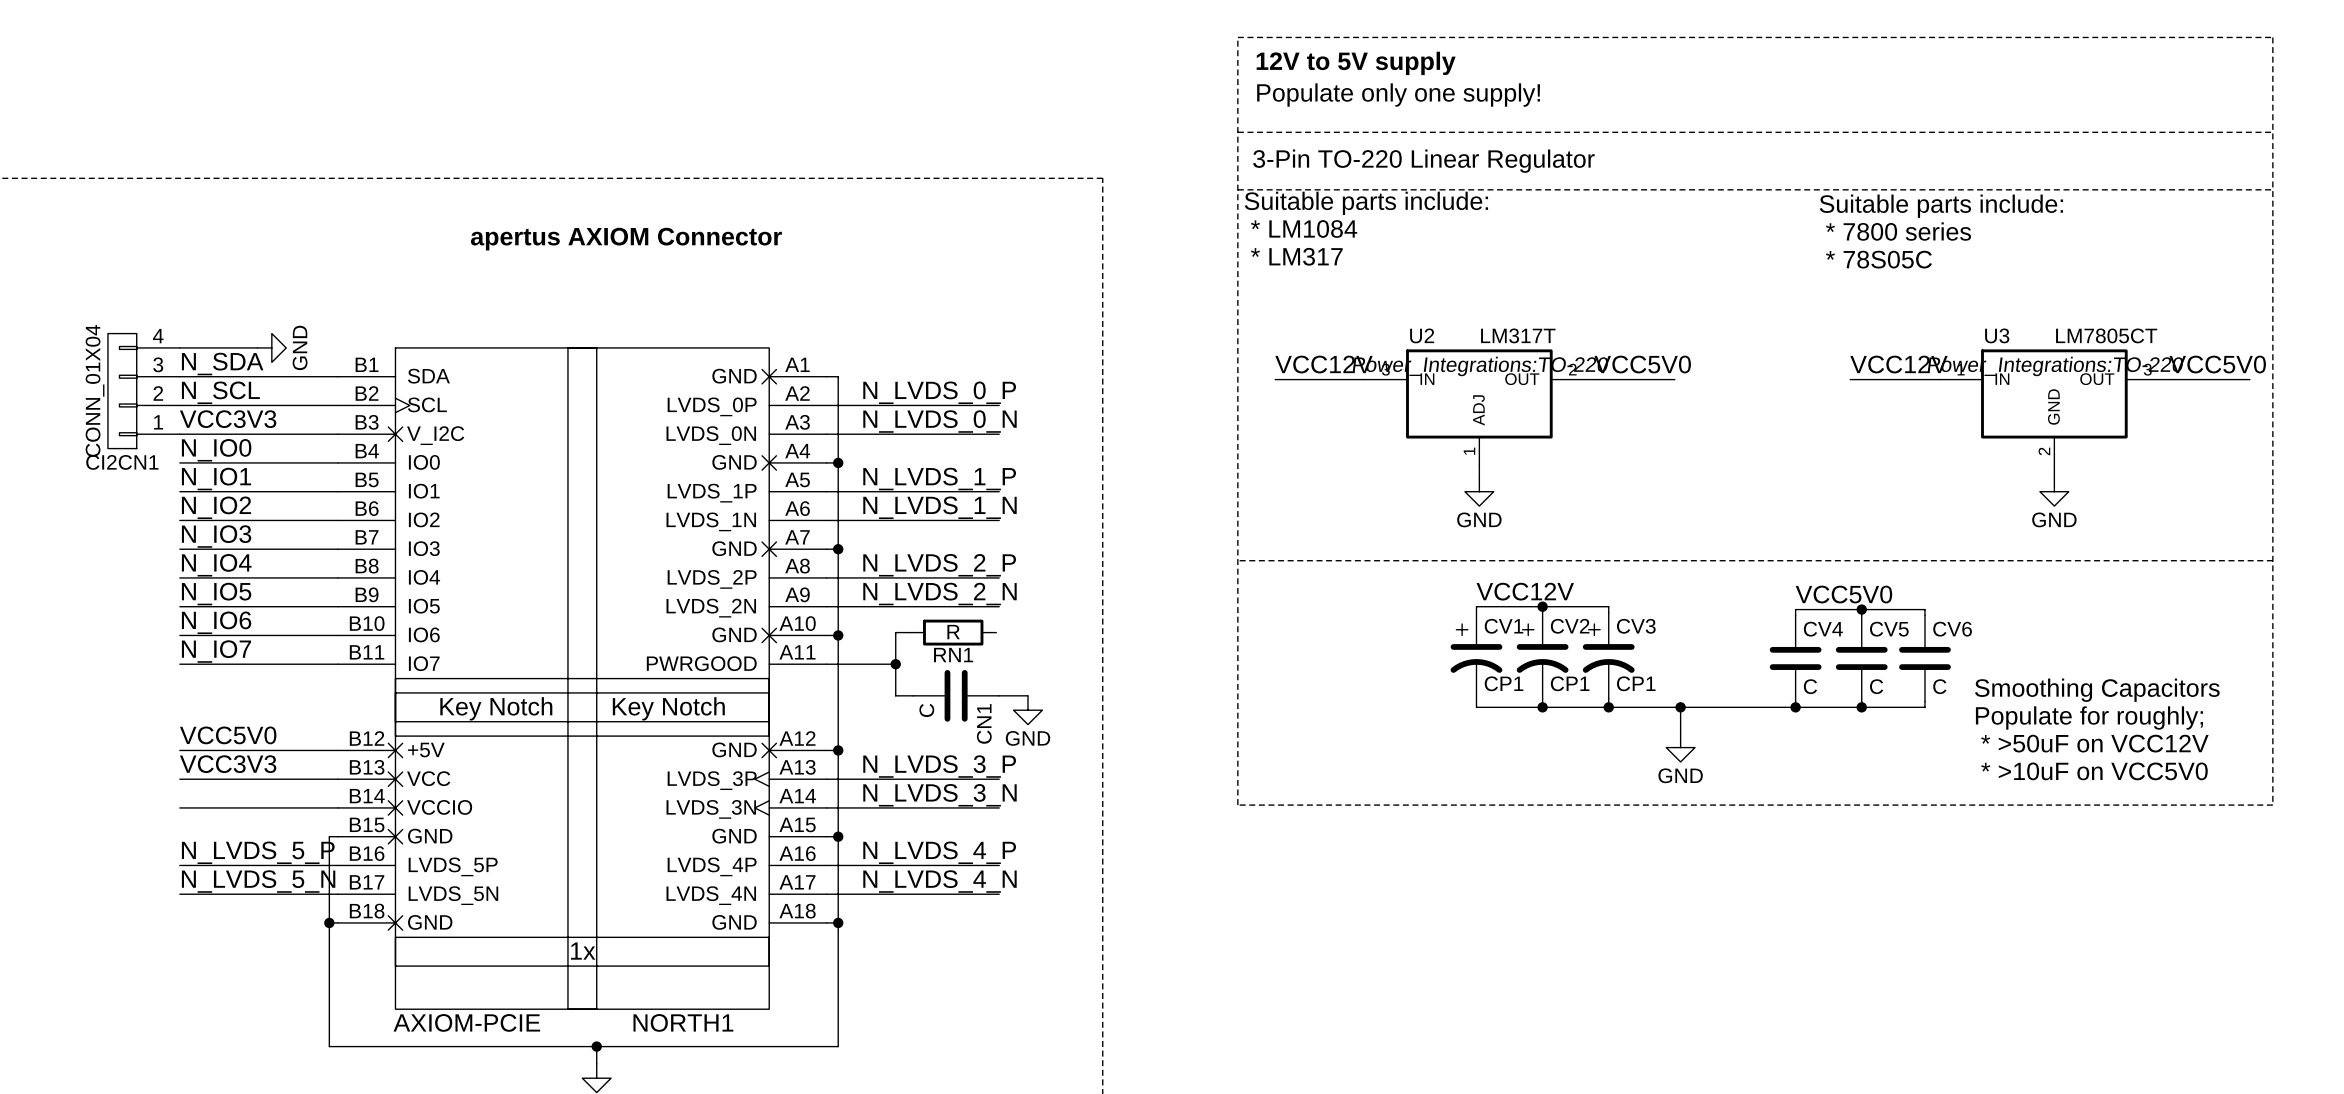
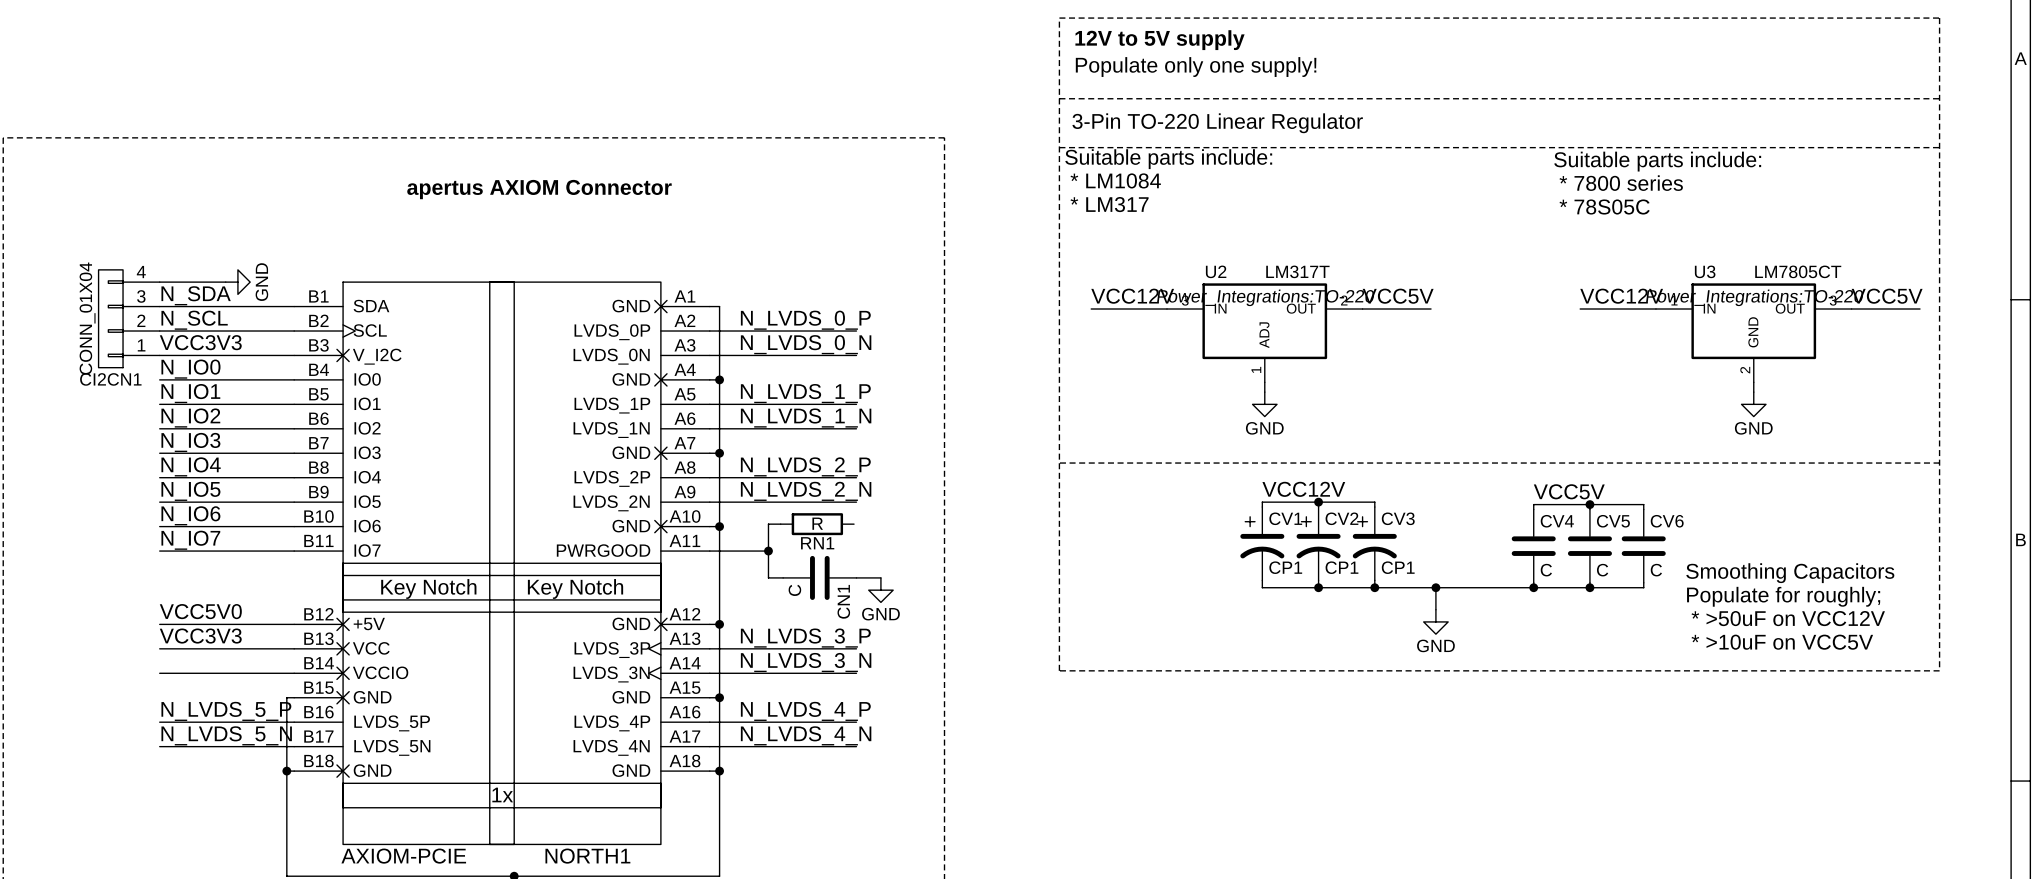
label: VCC5V0 (1642, 364) -> VCC5V (1398, 296)
label: VCC5V0 (2217, 364) -> VCC5V (1887, 296)
label: VCC5V0 (1843, 594) -> VCC5V (1569, 491)
text: * >10uF on VCC5V0 (2094, 771) -> * >10uF on VCC5V (1782, 642)

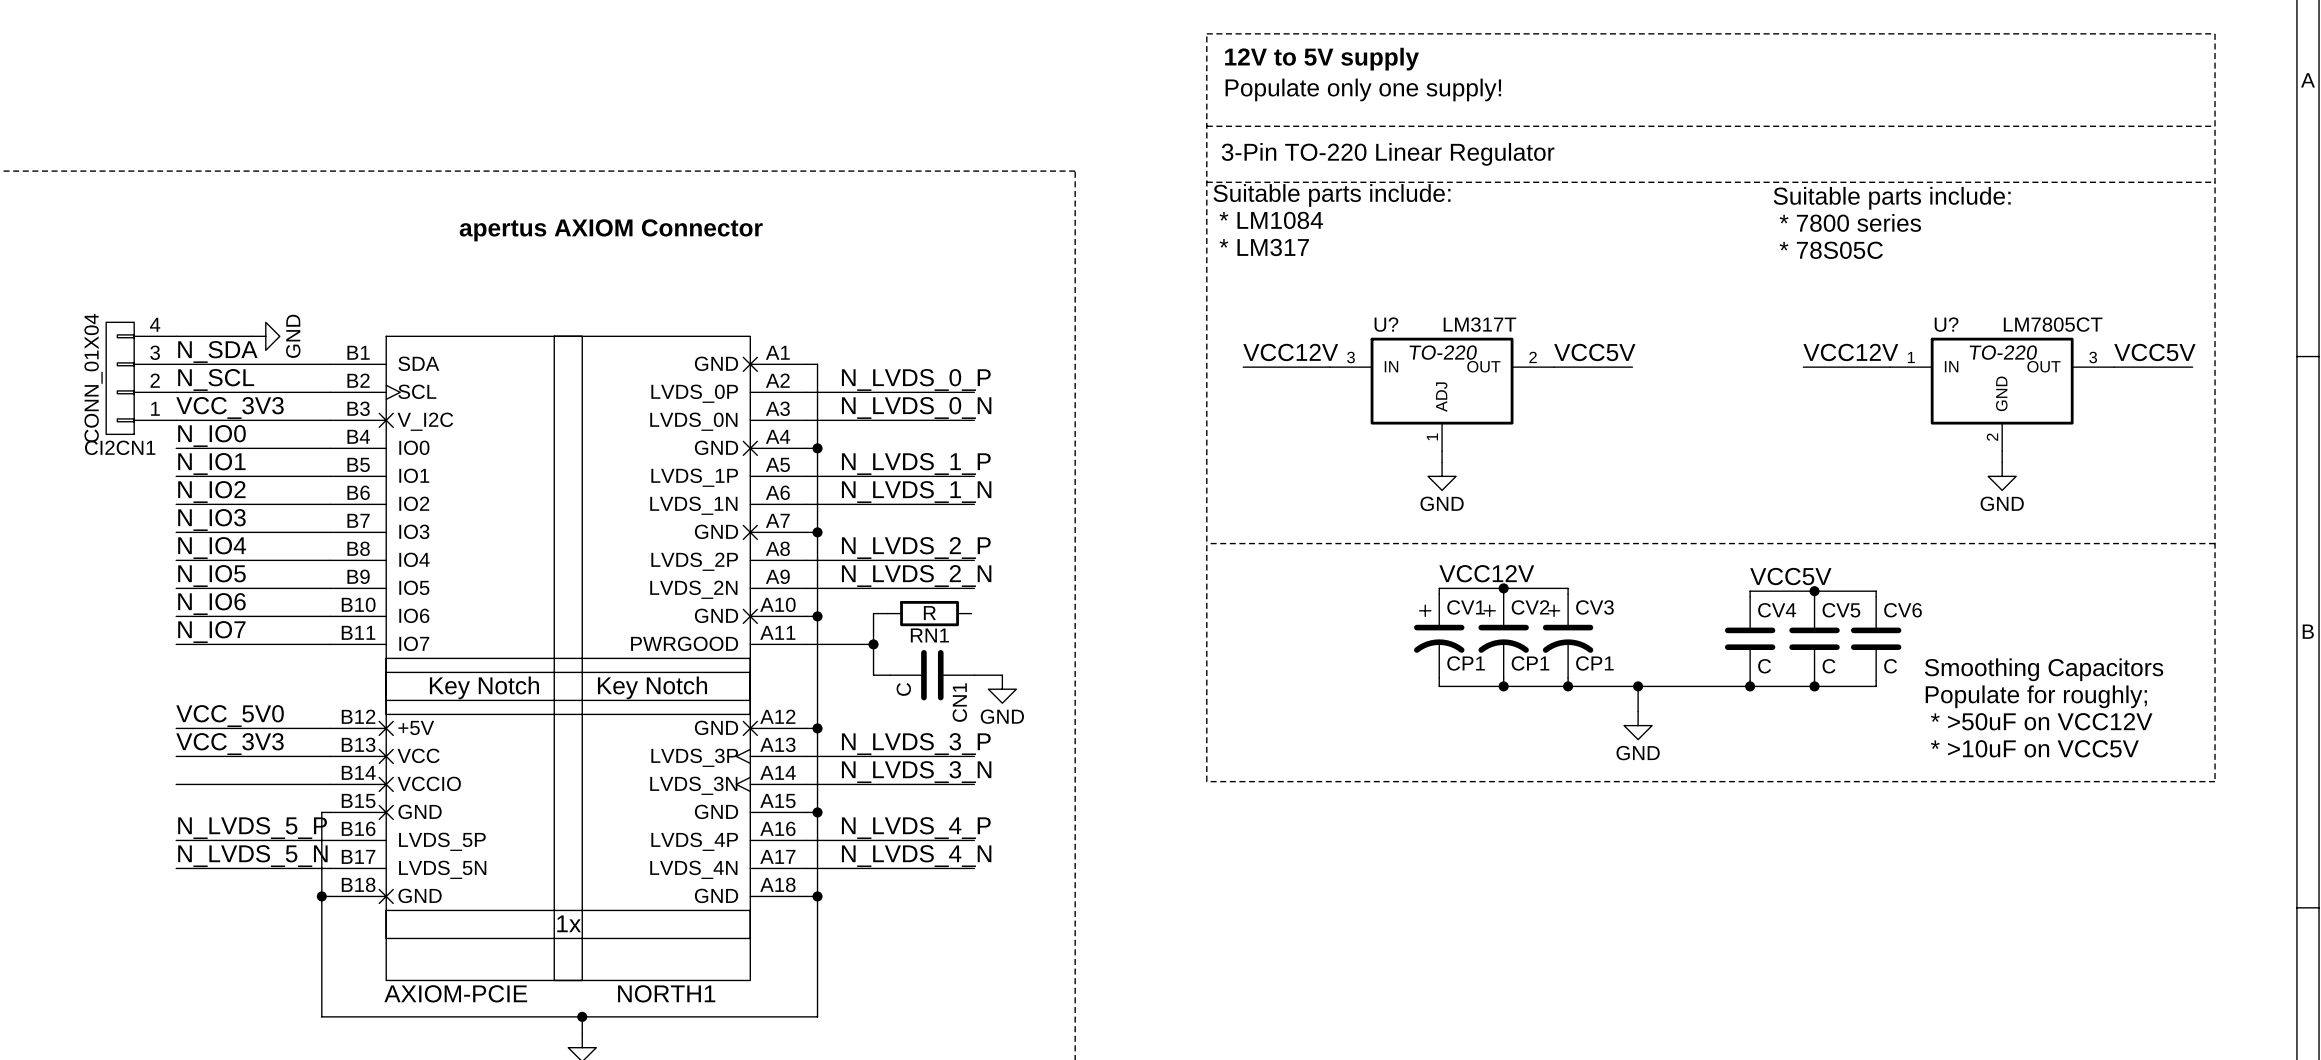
U2 name: U2 (1216, 271) -> U? (1386, 324)
U3 name: U3 (1705, 271) -> U? (1946, 324)
U2 text: Power_Integrations:TO-220 (1265, 297) -> TO-220 (1443, 352)
U3 text: Power_Integrations:TO-220 (1754, 297) -> TO-220 (2003, 352)
label: VCC3V3 (200, 342) -> VCC_3V3 (230, 407)
label: VCC5V0 (200, 611) -> VCC_5V0 (230, 716)
label: VCC3V3 (200, 636) -> VCC_3V3 (230, 744)

